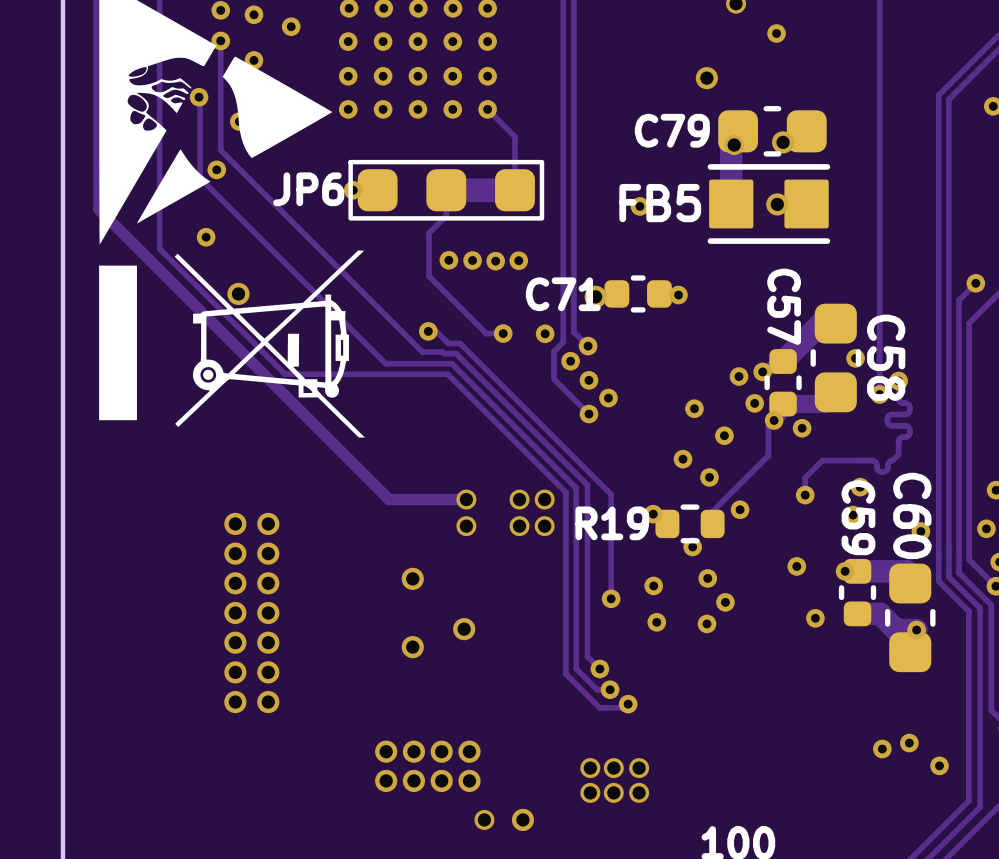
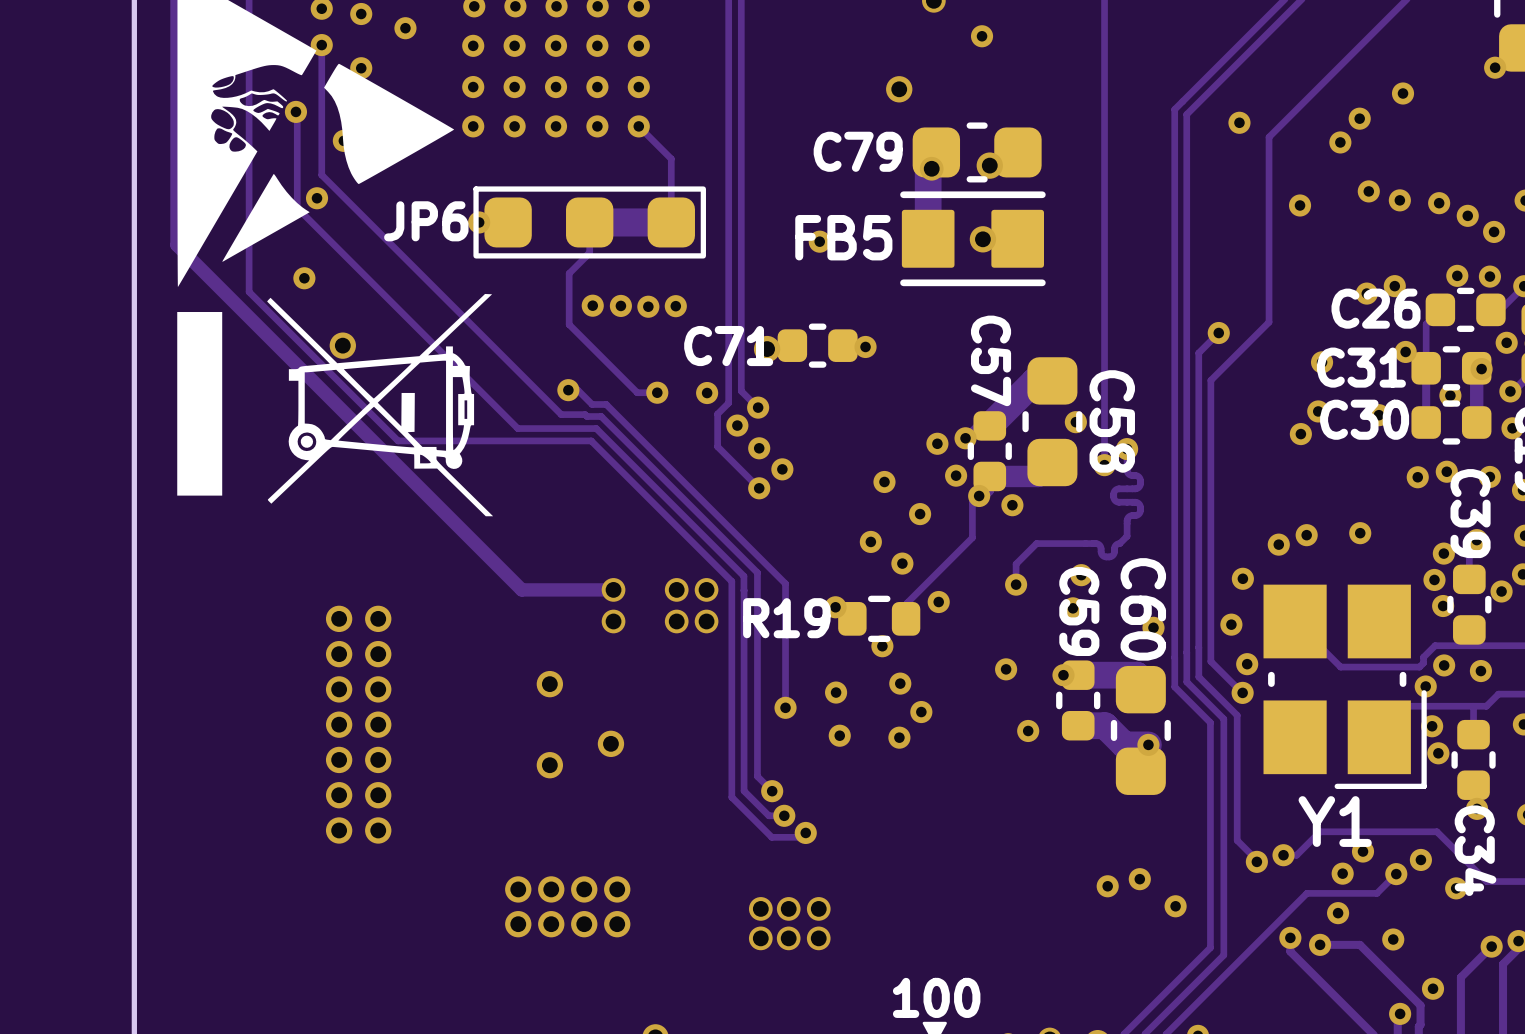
via: (484, 819) -> none
via: (522, 819) -> none

